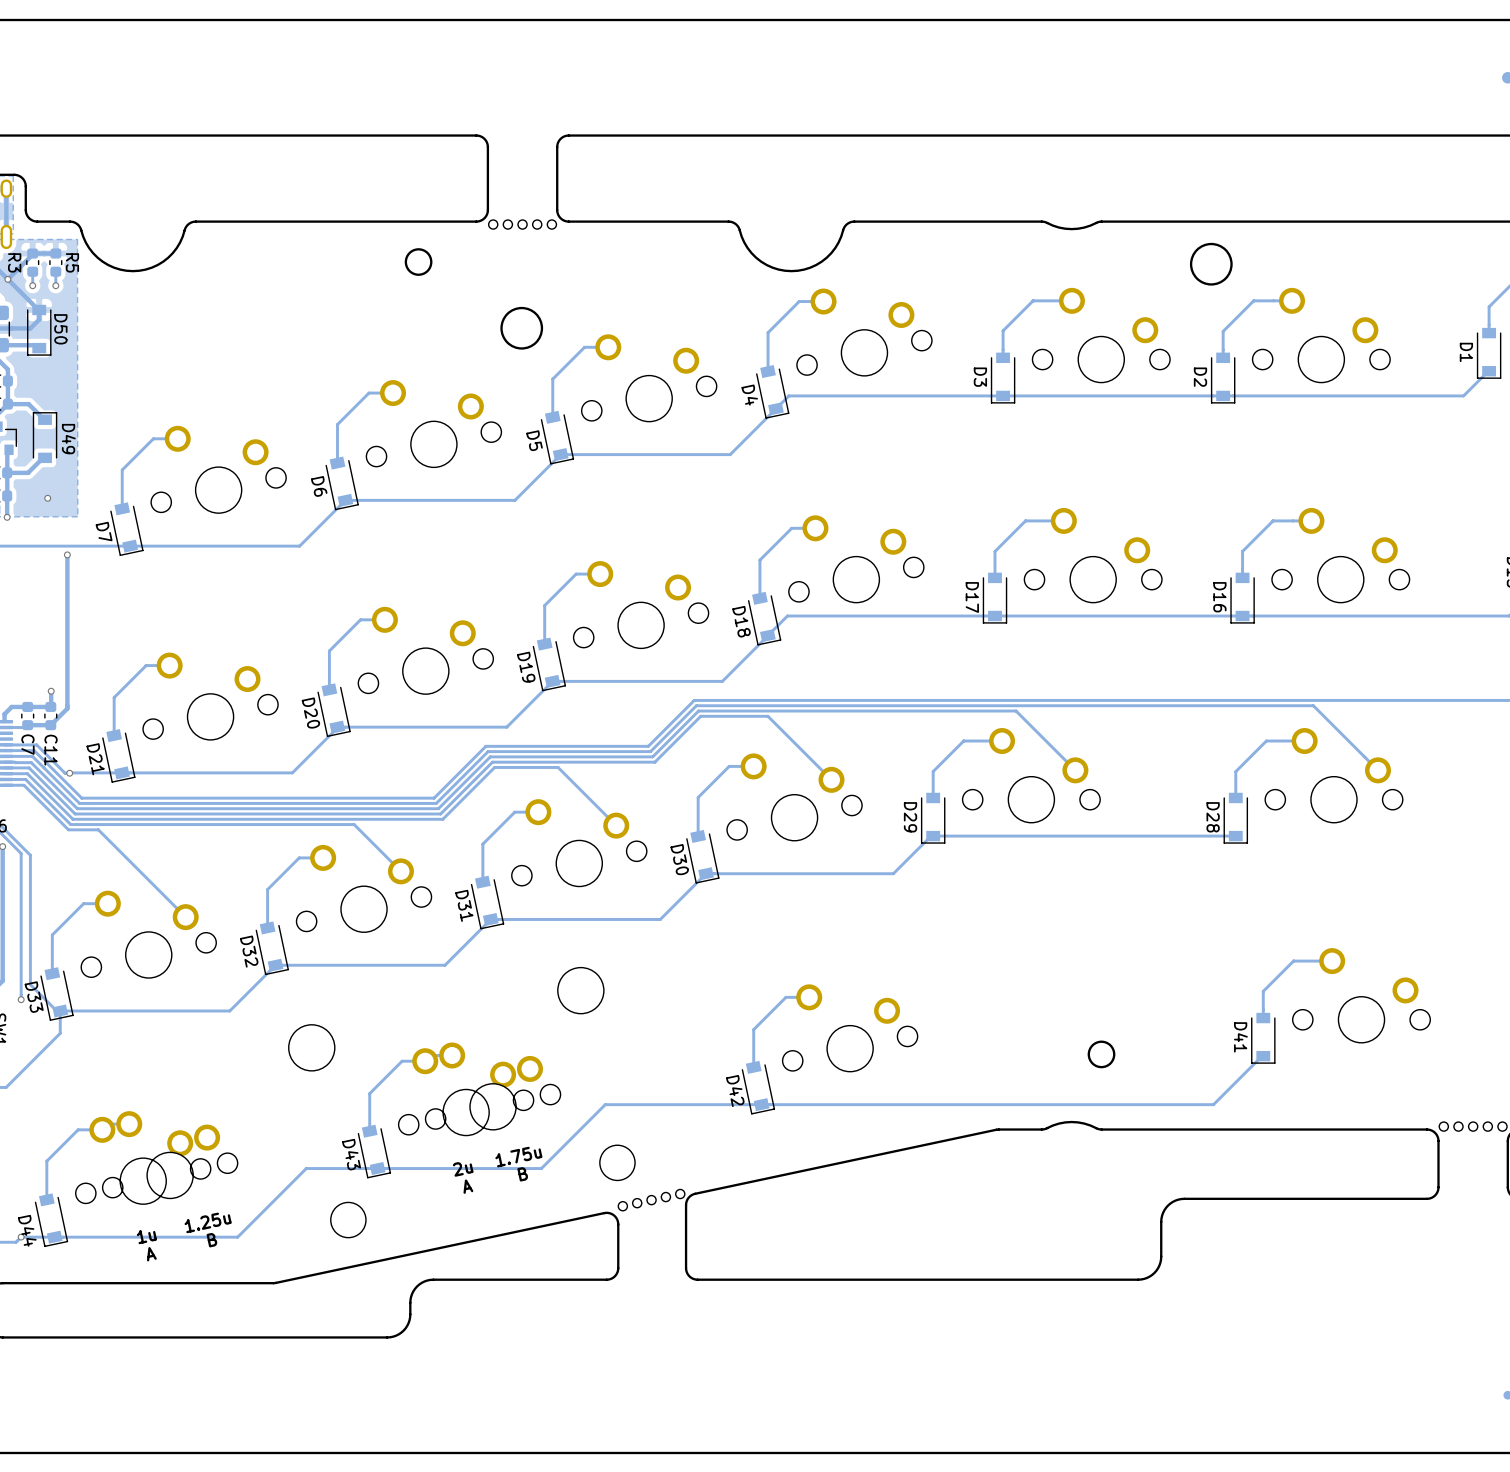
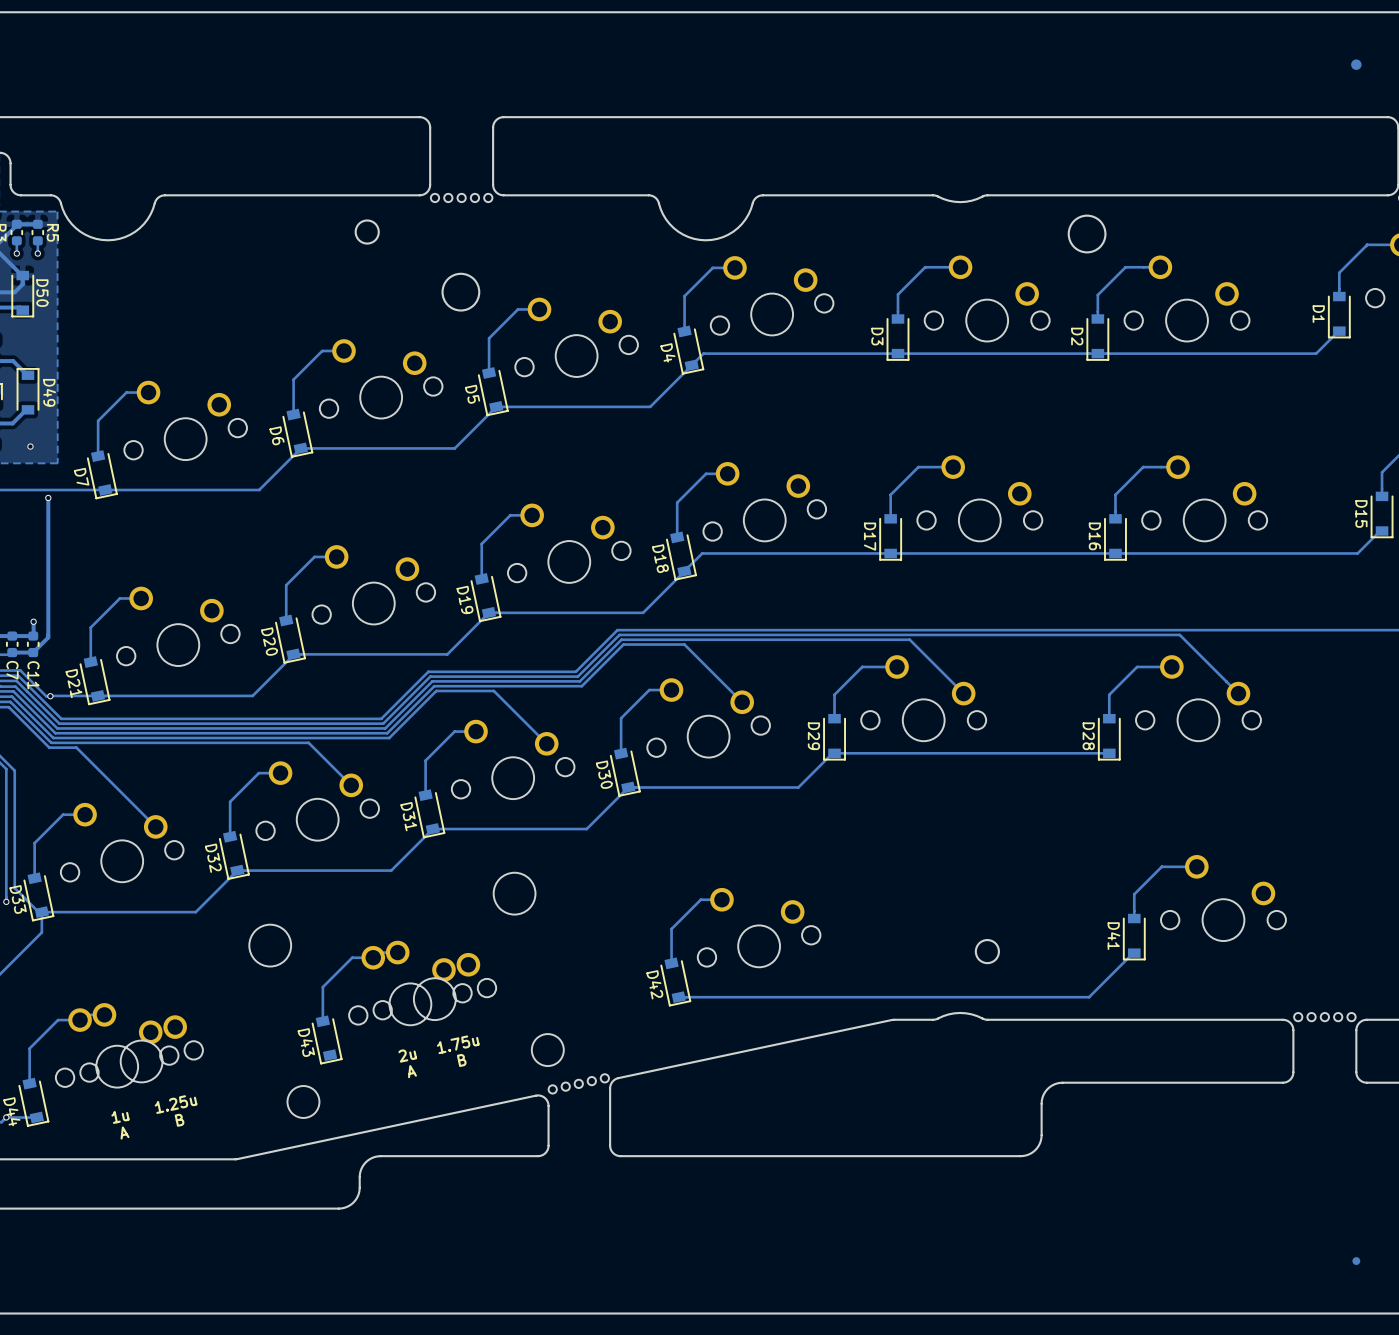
track: (761, 1104) (605, 1104) (541, 1168) (306, 1168) (237, 1237) (54, 1237) -> none

